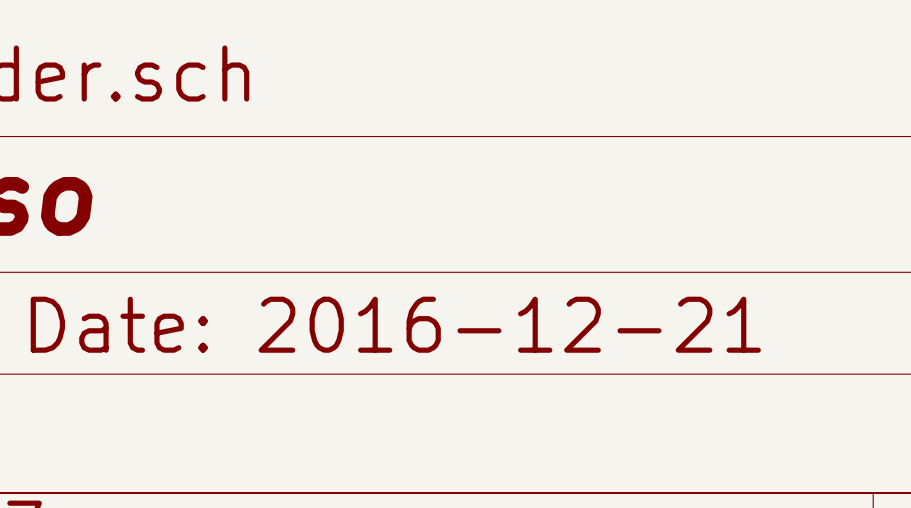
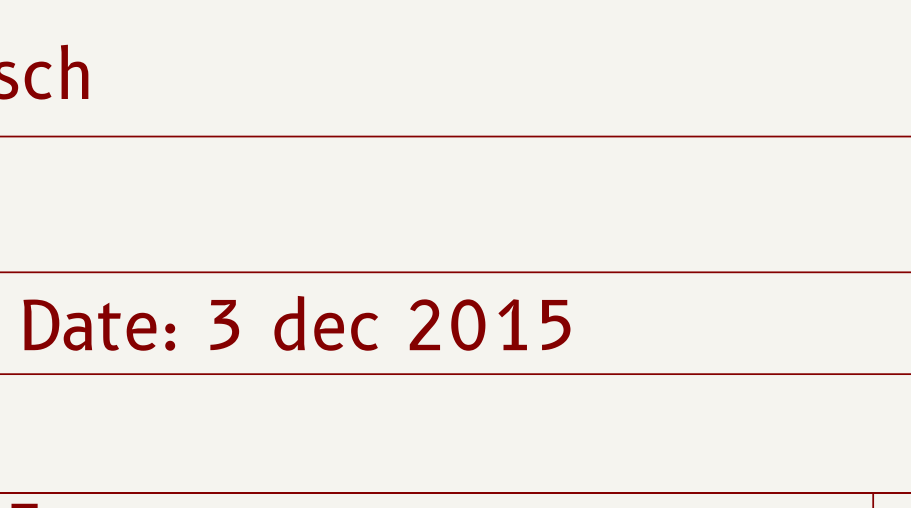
title block: Date: 2016-12-21 (395, 324) -> Date: 3 dec 2015 (296, 323)

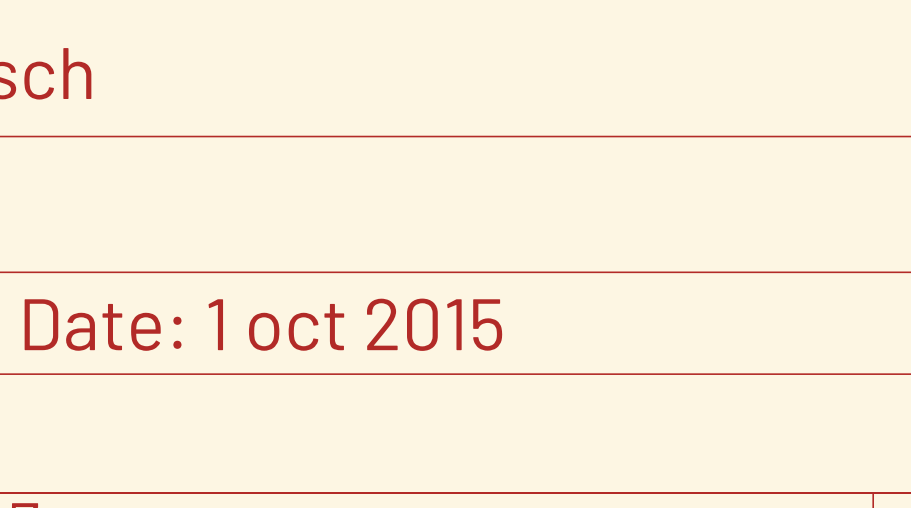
title block: Date: 3 dec 2015 (296, 323) -> Date: 1 oct 2015 (263, 324)

